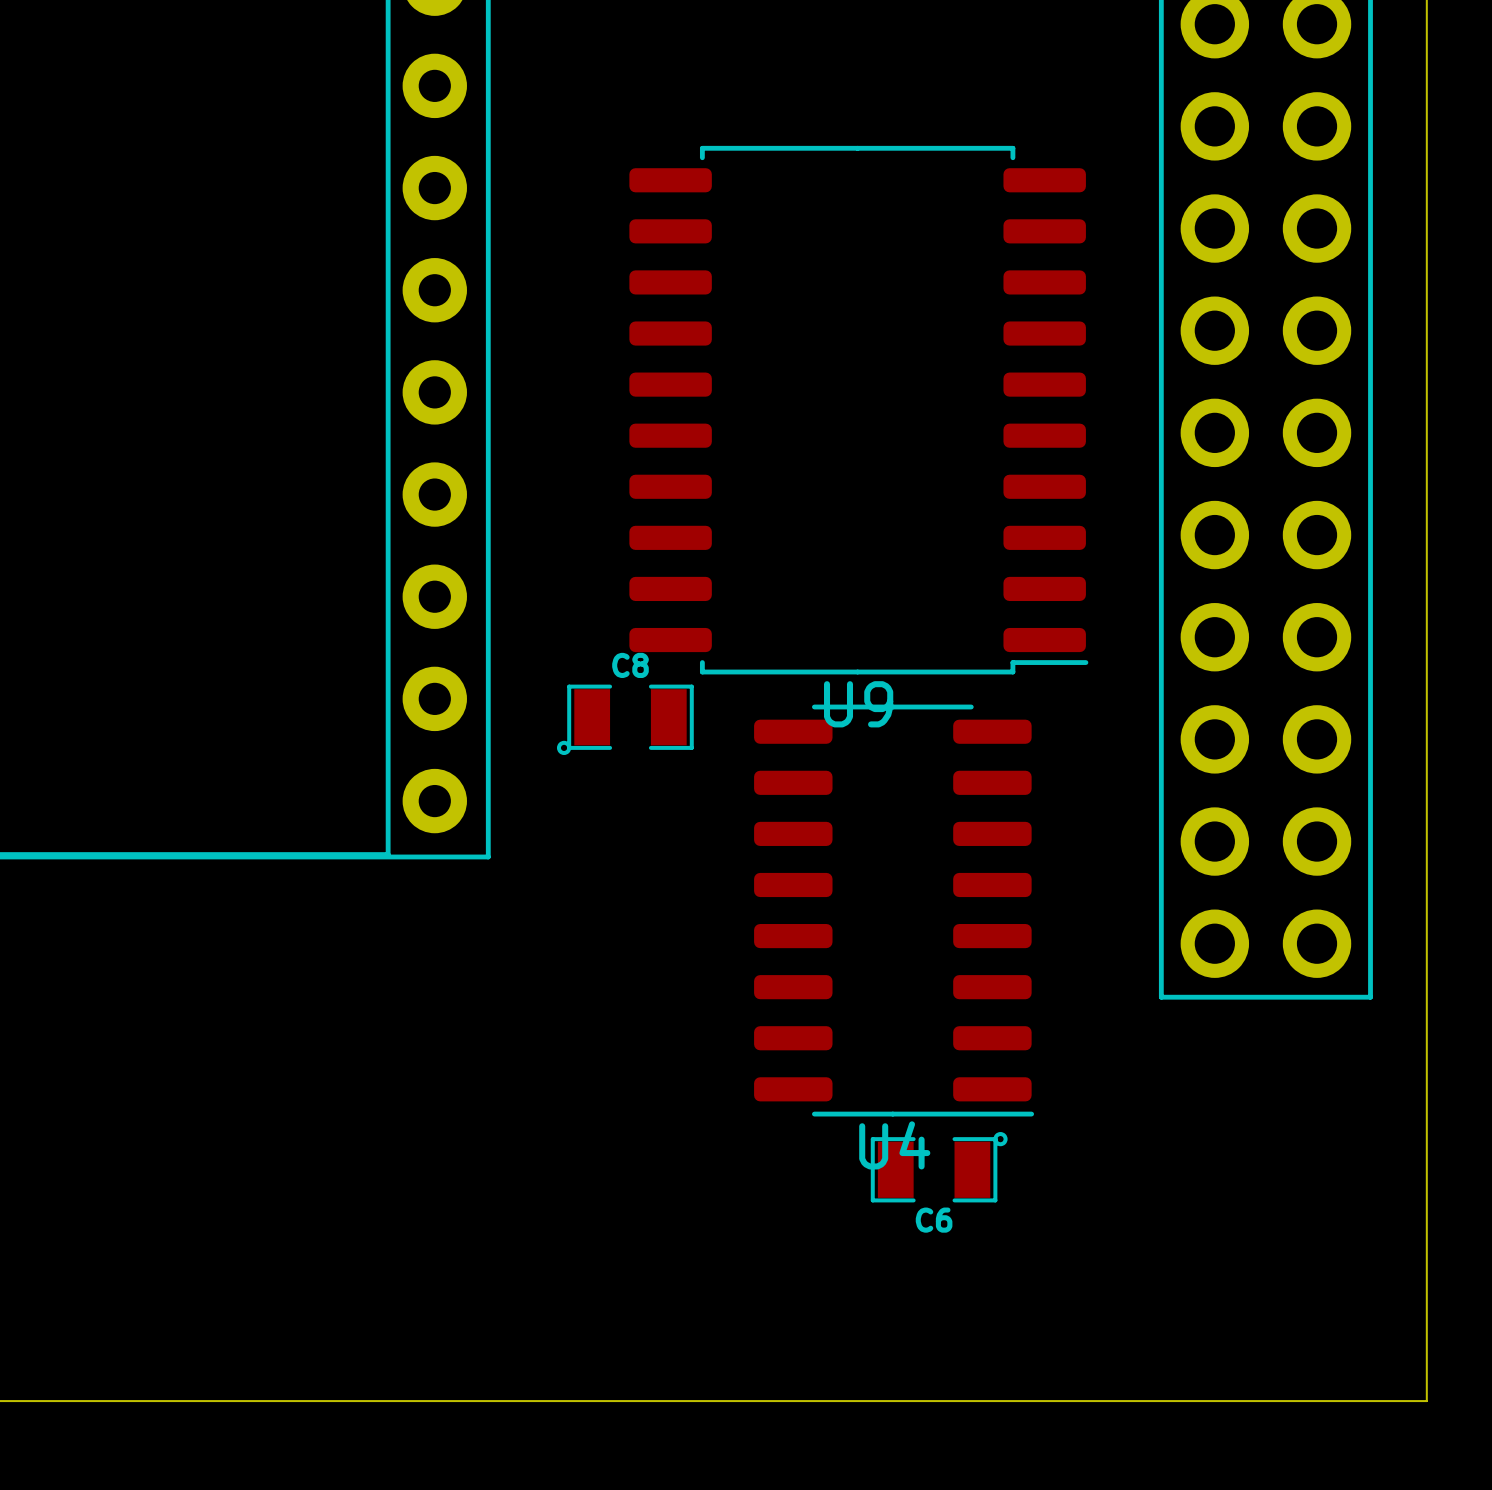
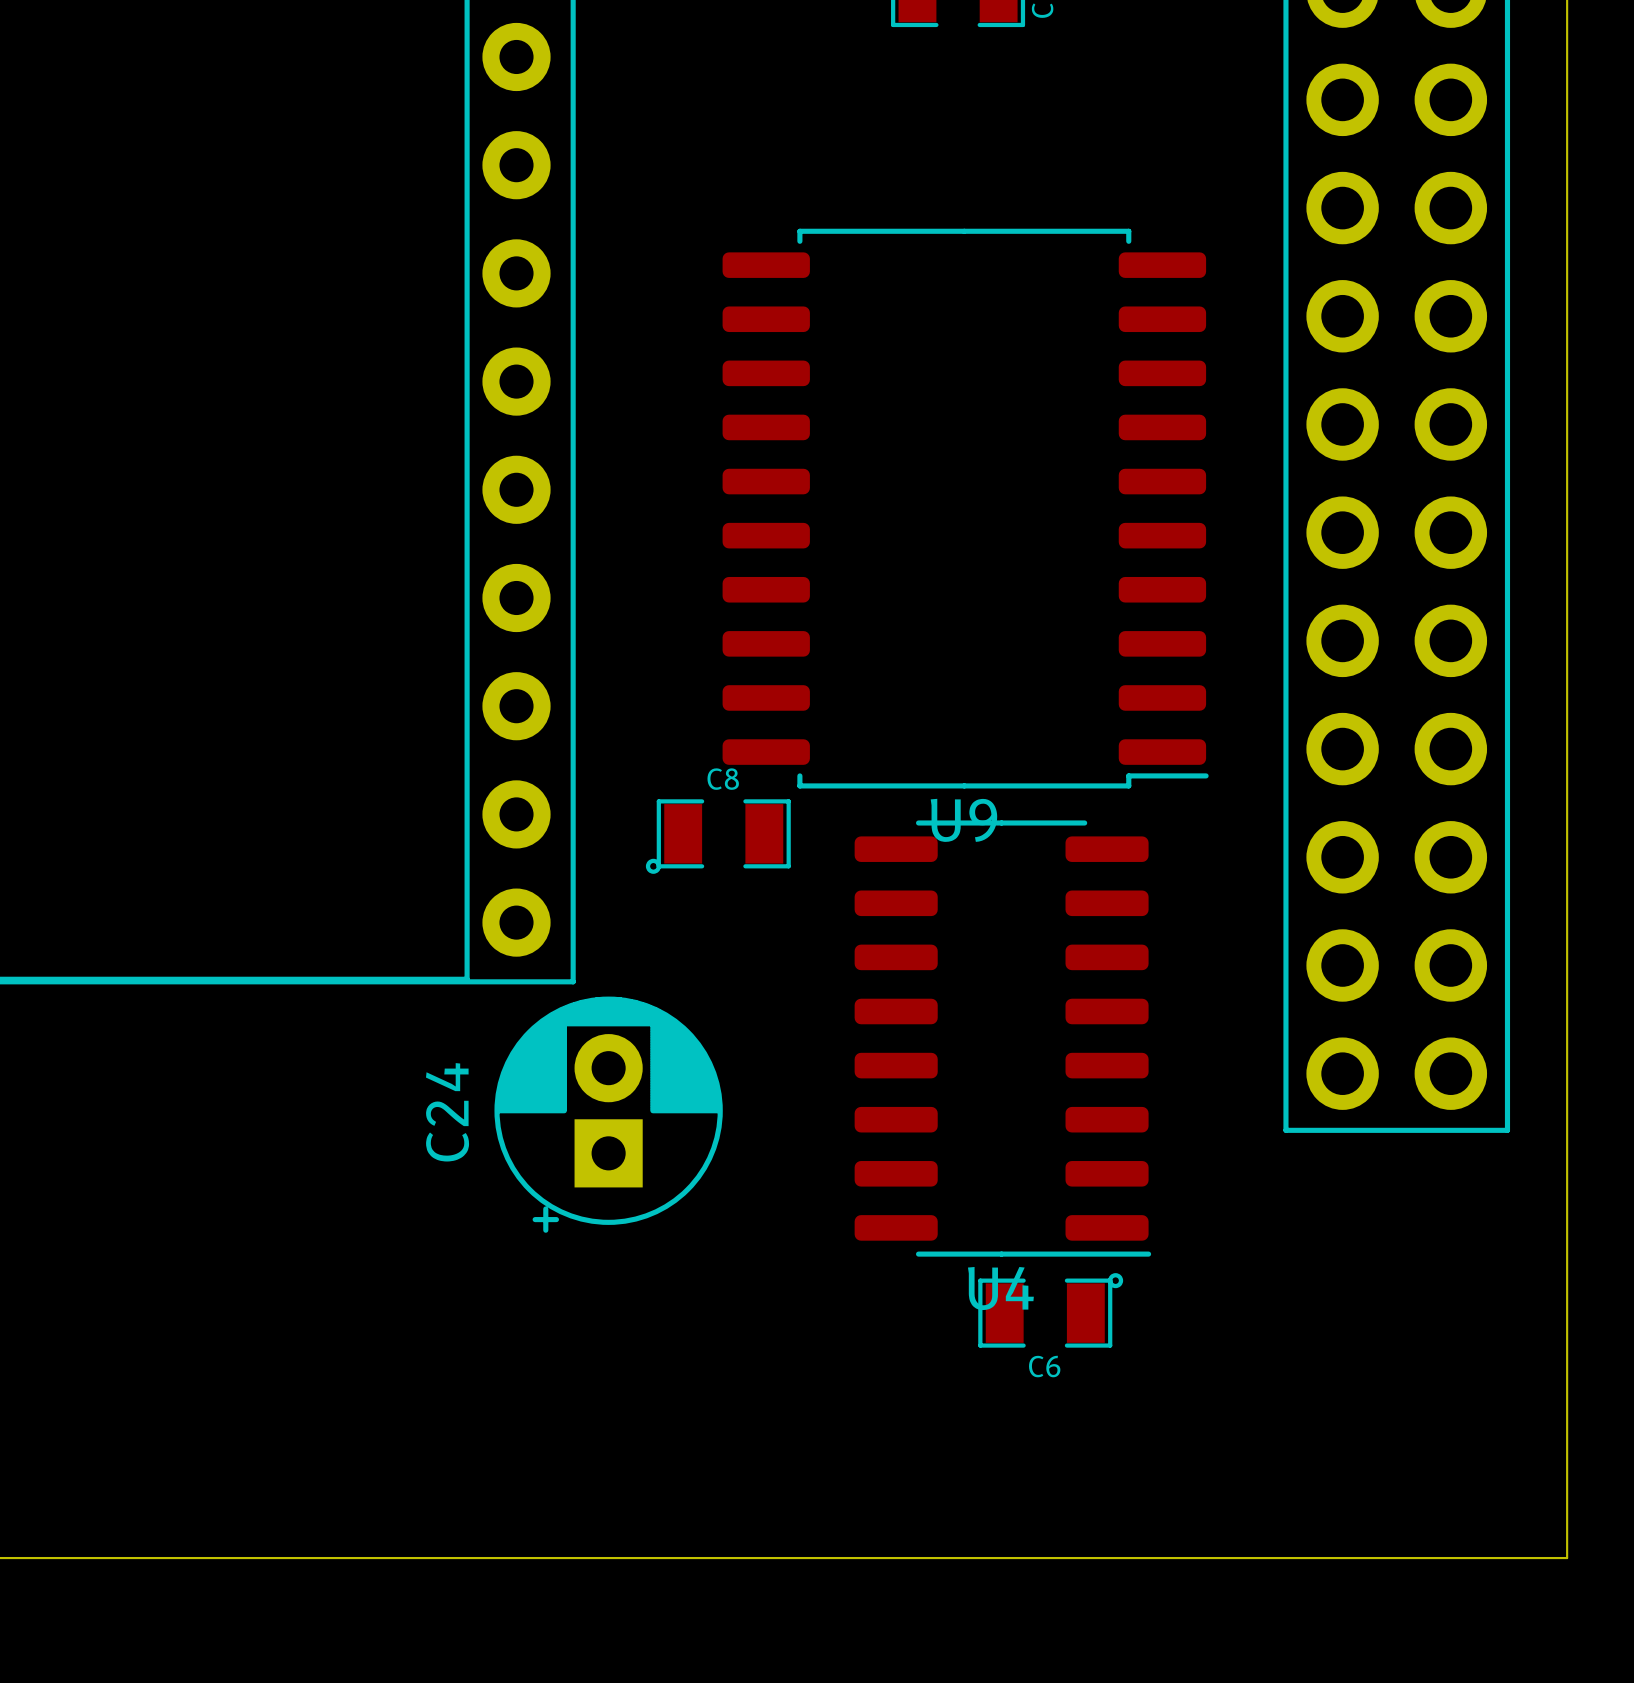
C24: none -> (608, 1114)

